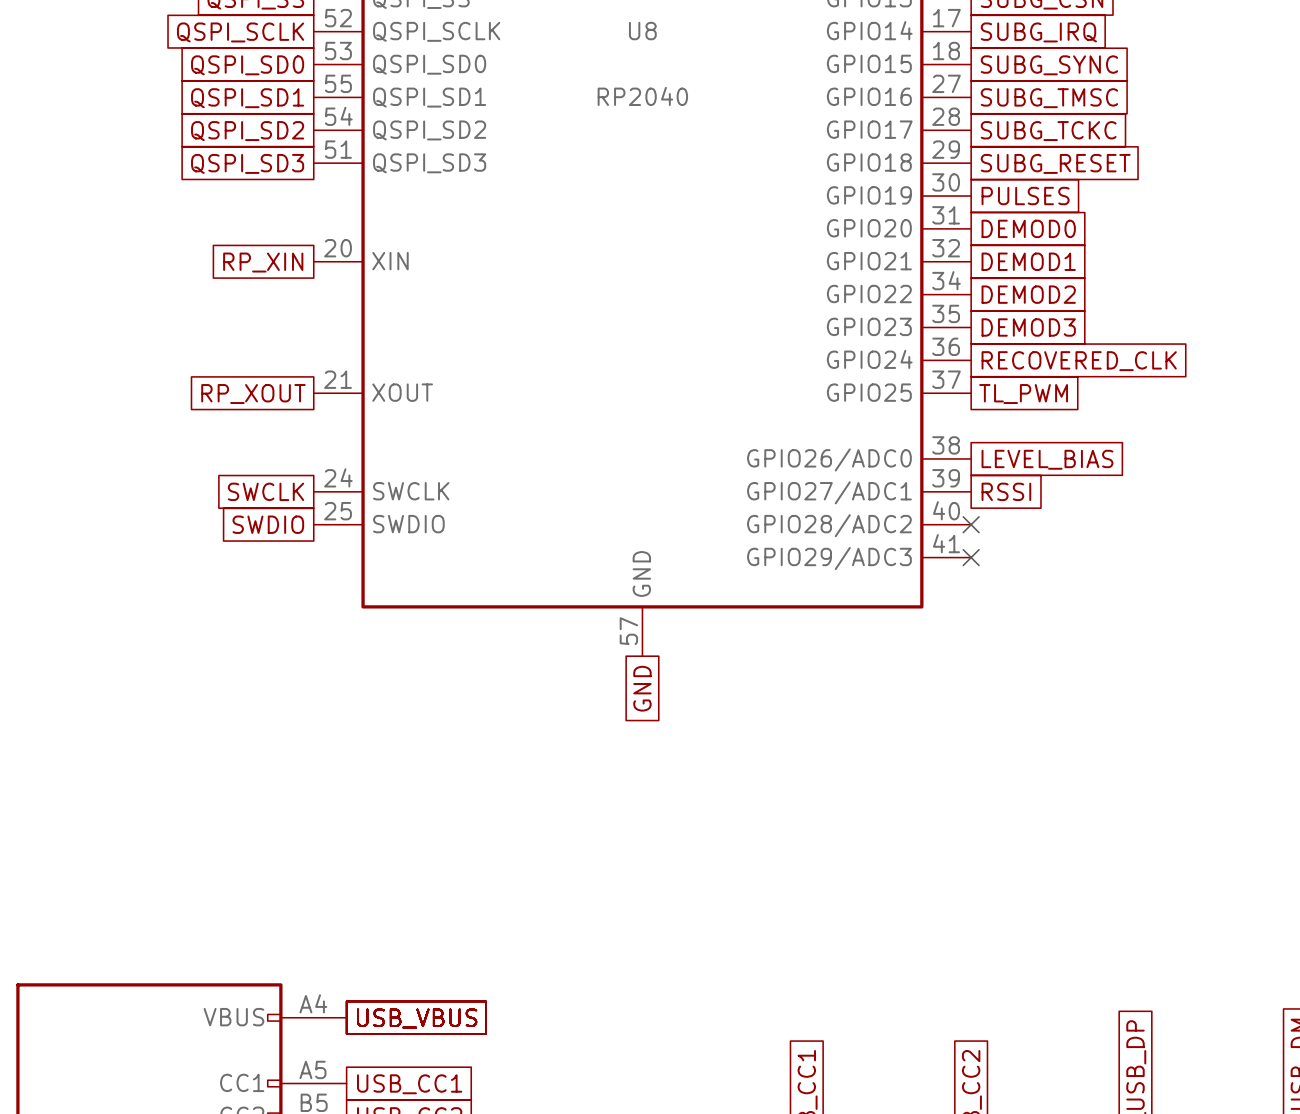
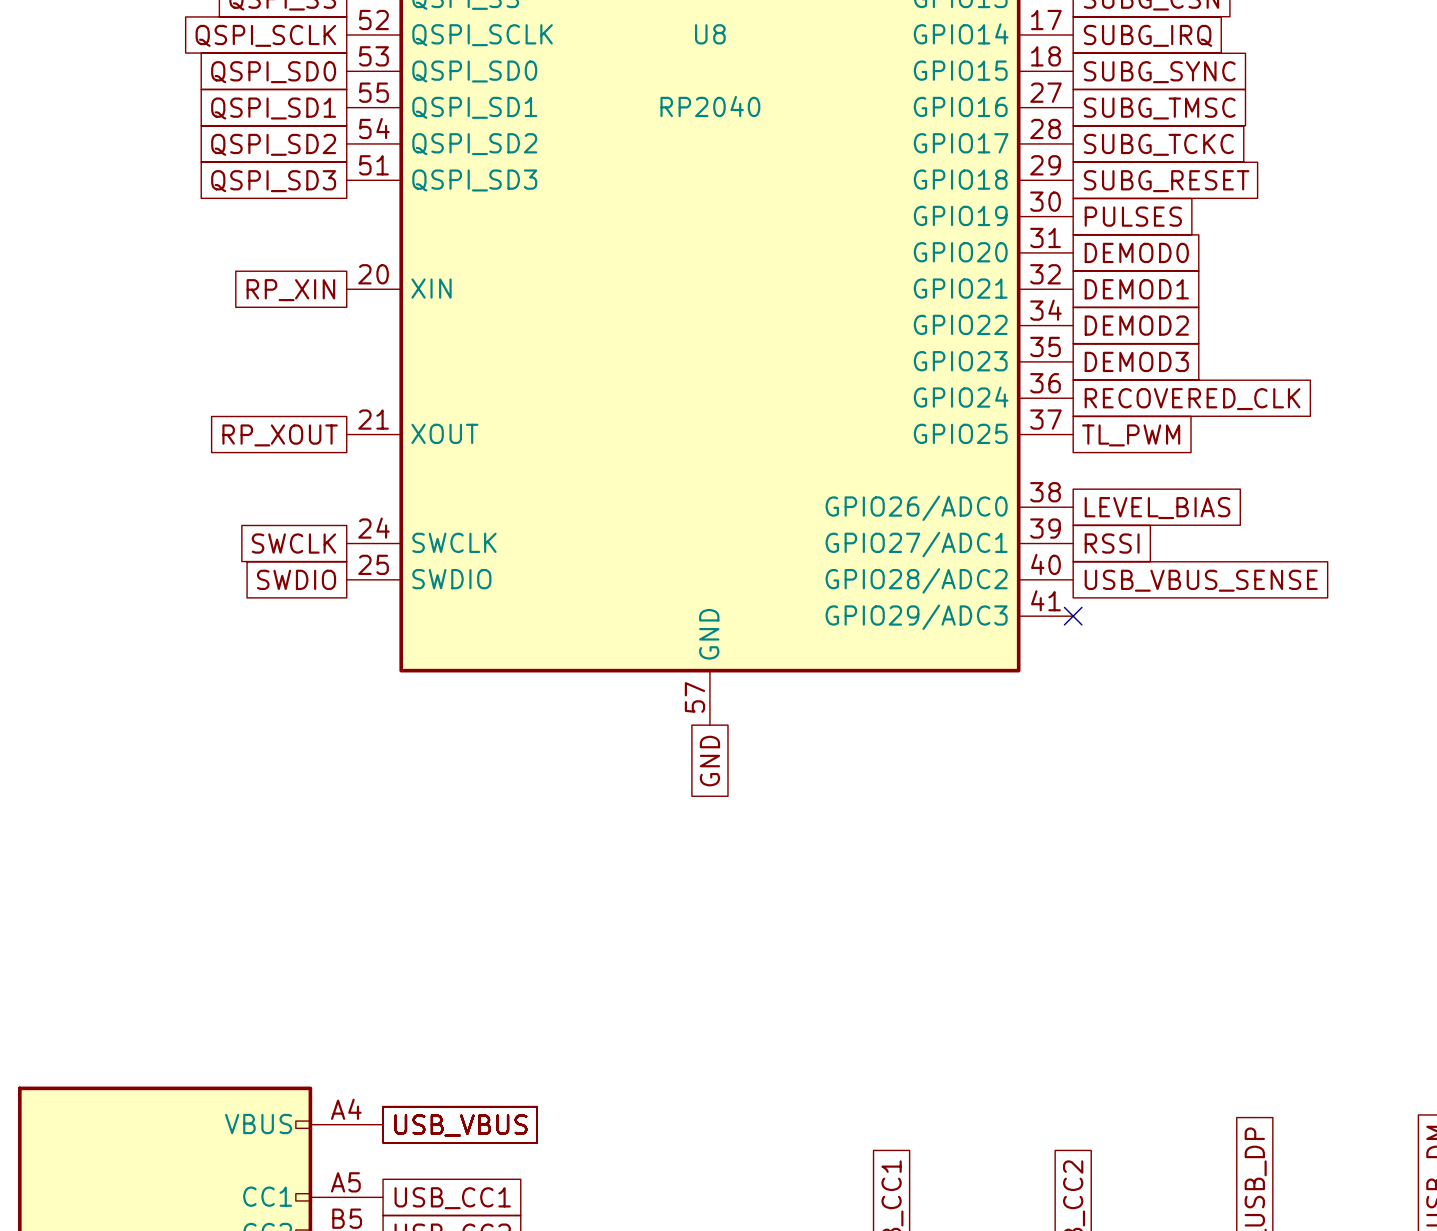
no-connect mark: (971, 524) -> none
global label: none -> USB_VBUS_SENSE (1201, 580)

